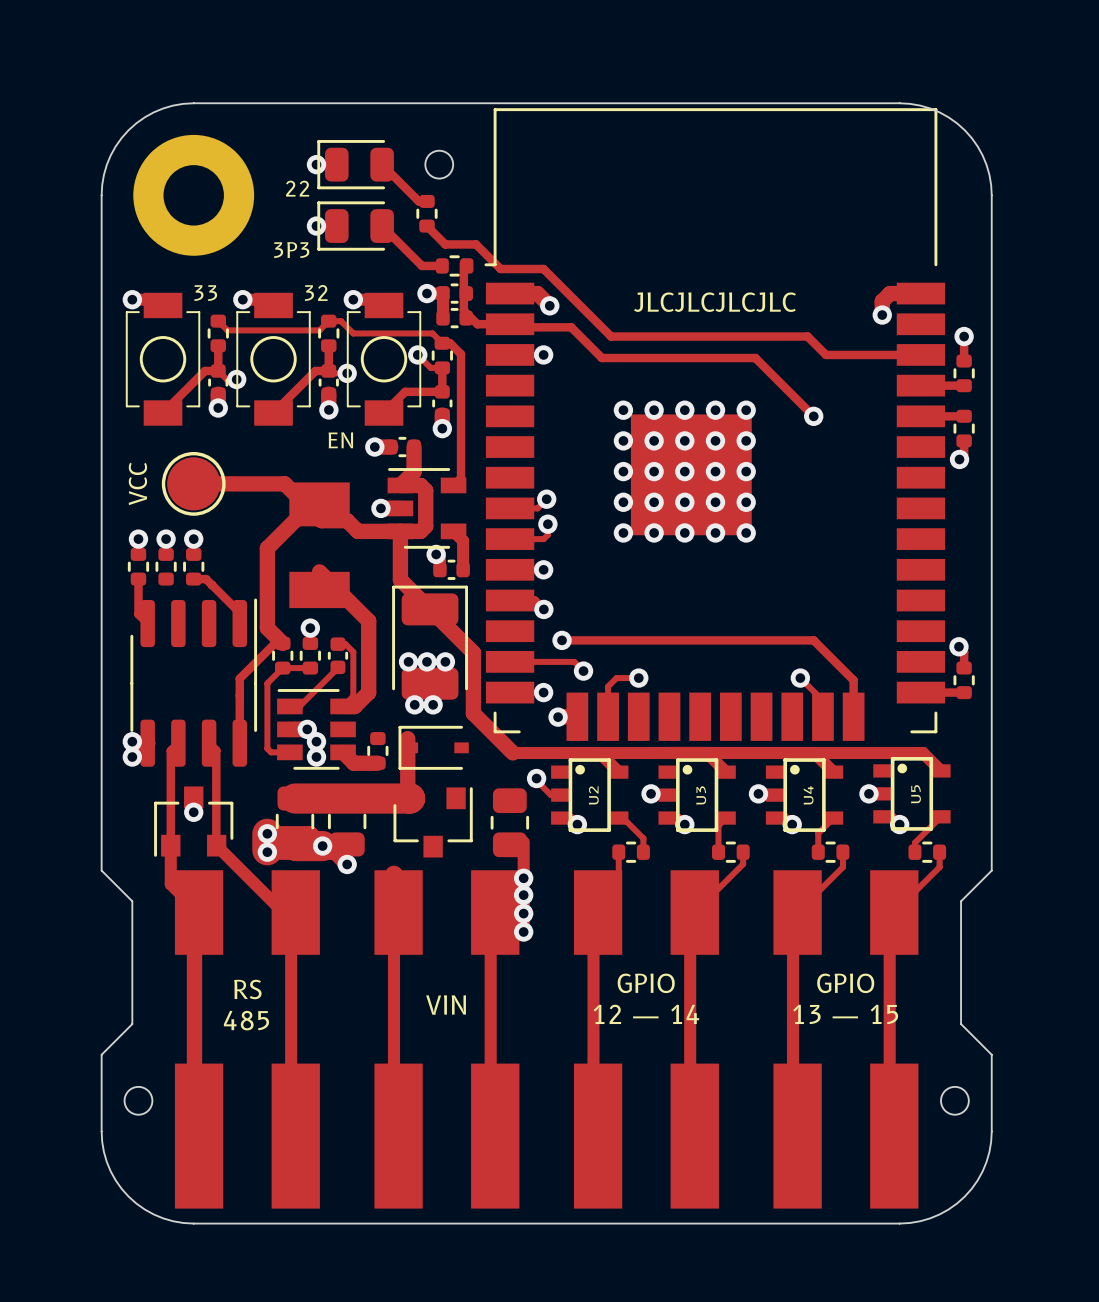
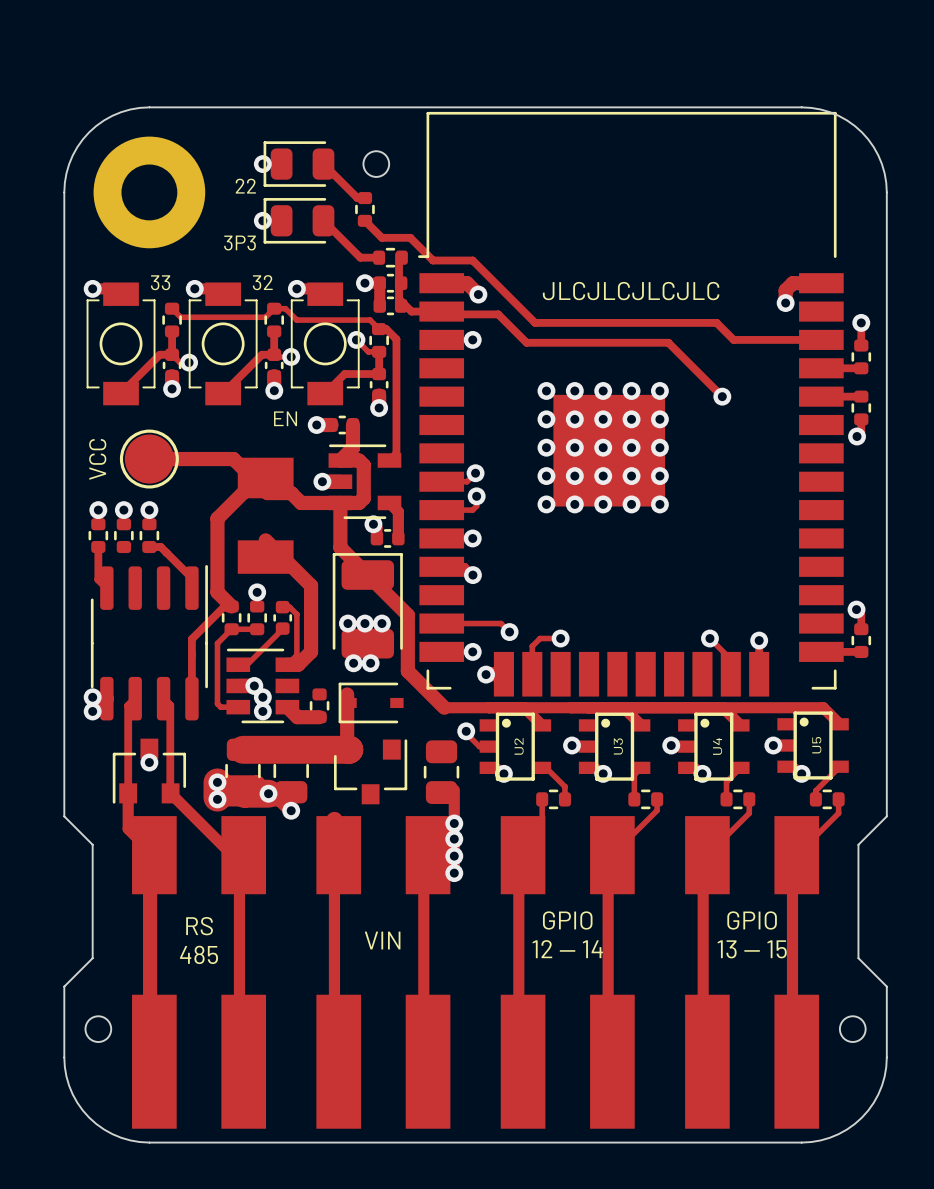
track: (562, 640) (813, 640) (853, 680) -> none
via: (562, 640) -> none
via: none -> (759, 640)

